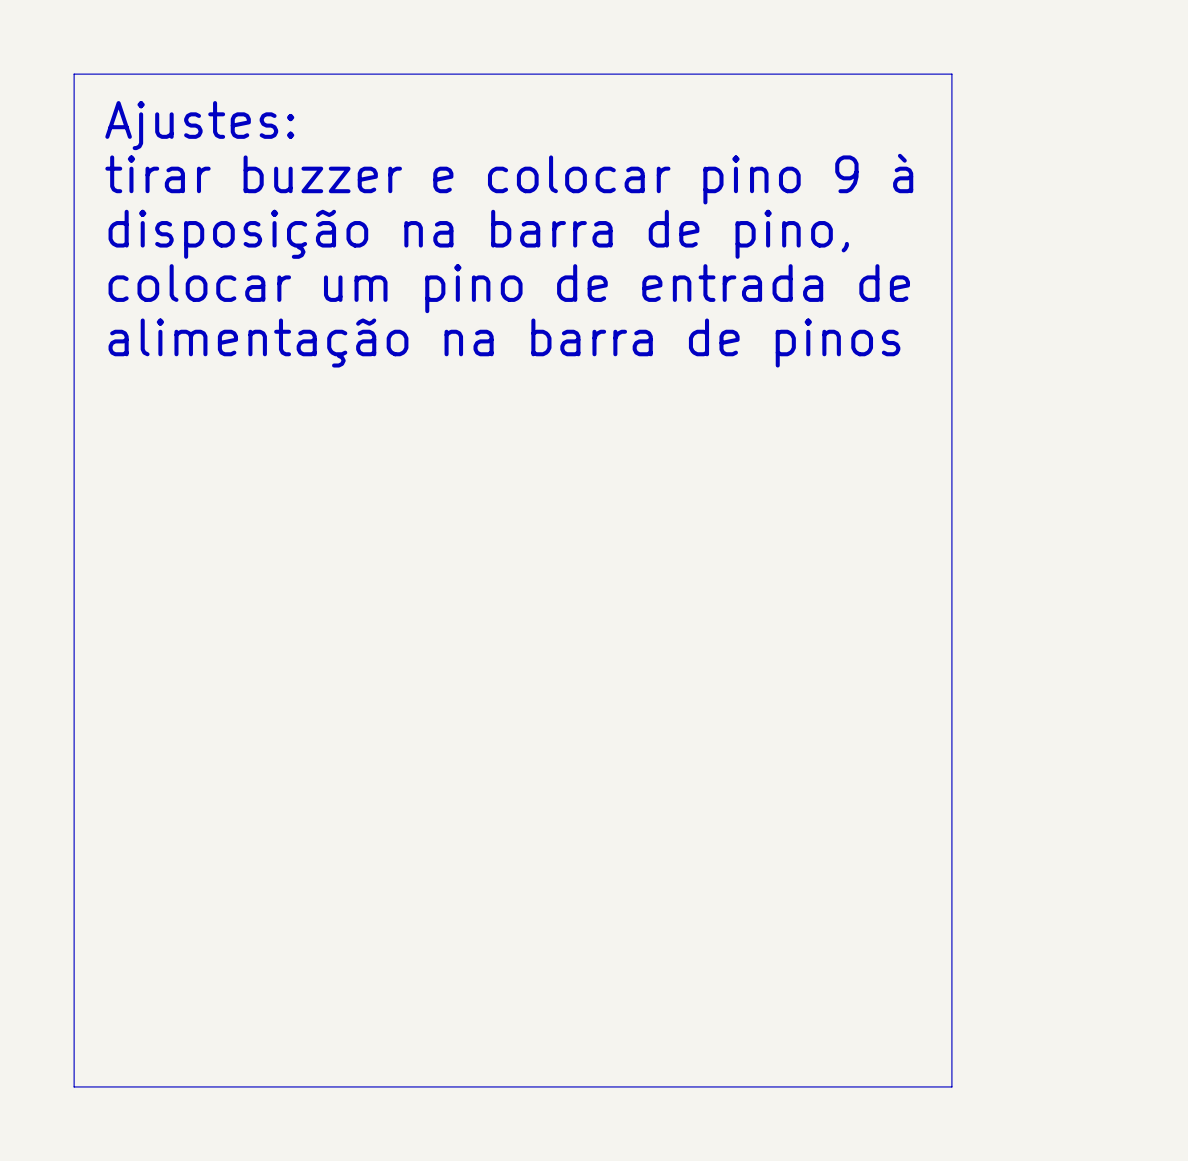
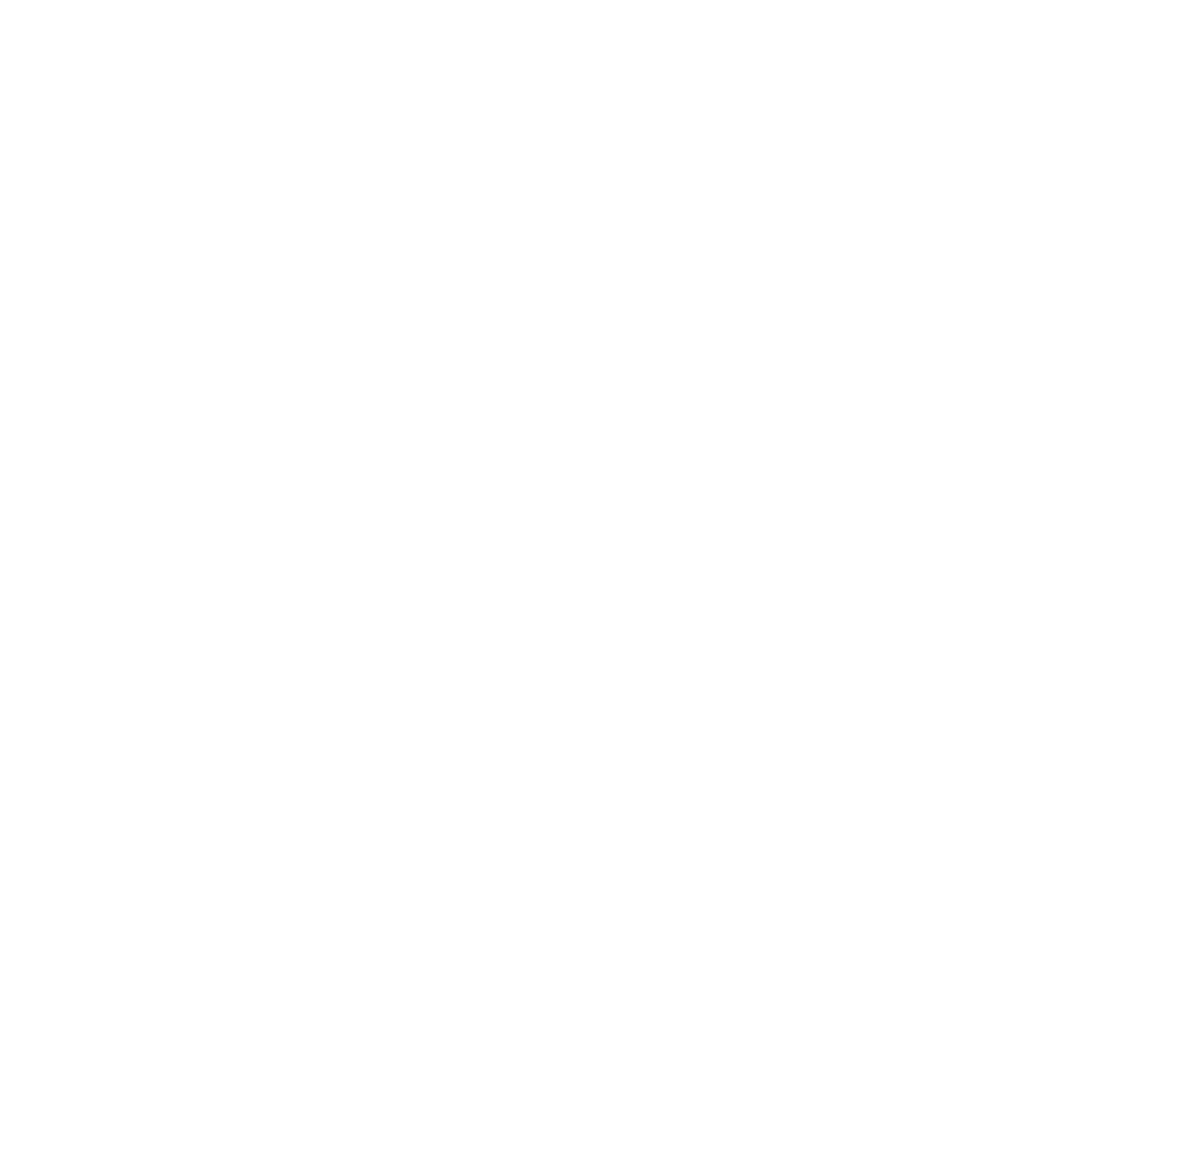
line: (74, 74) (951, 74) (951, 1086) (74, 1086) (74, 74) -> none
text: Ajustes: (199, 125) -> none
text: tirar buzzer e colocar pino 9 à (509, 179) -> none
text: disposição na barra de pino, (478, 234) -> none
text: colocar um pino de entrada de (509, 288) -> none
text: alimentação na barra de pinos (504, 343) -> none

